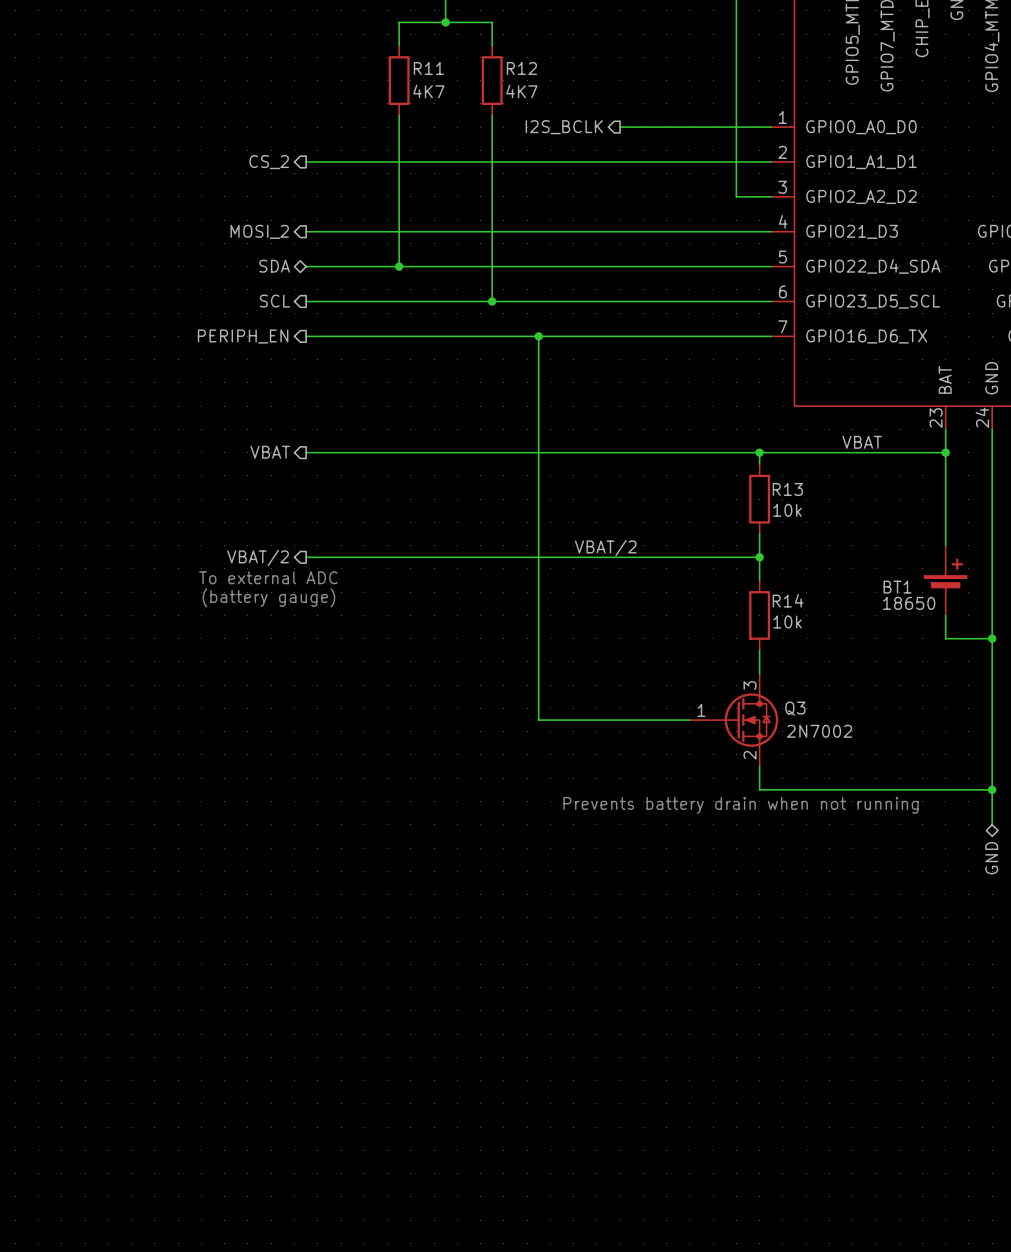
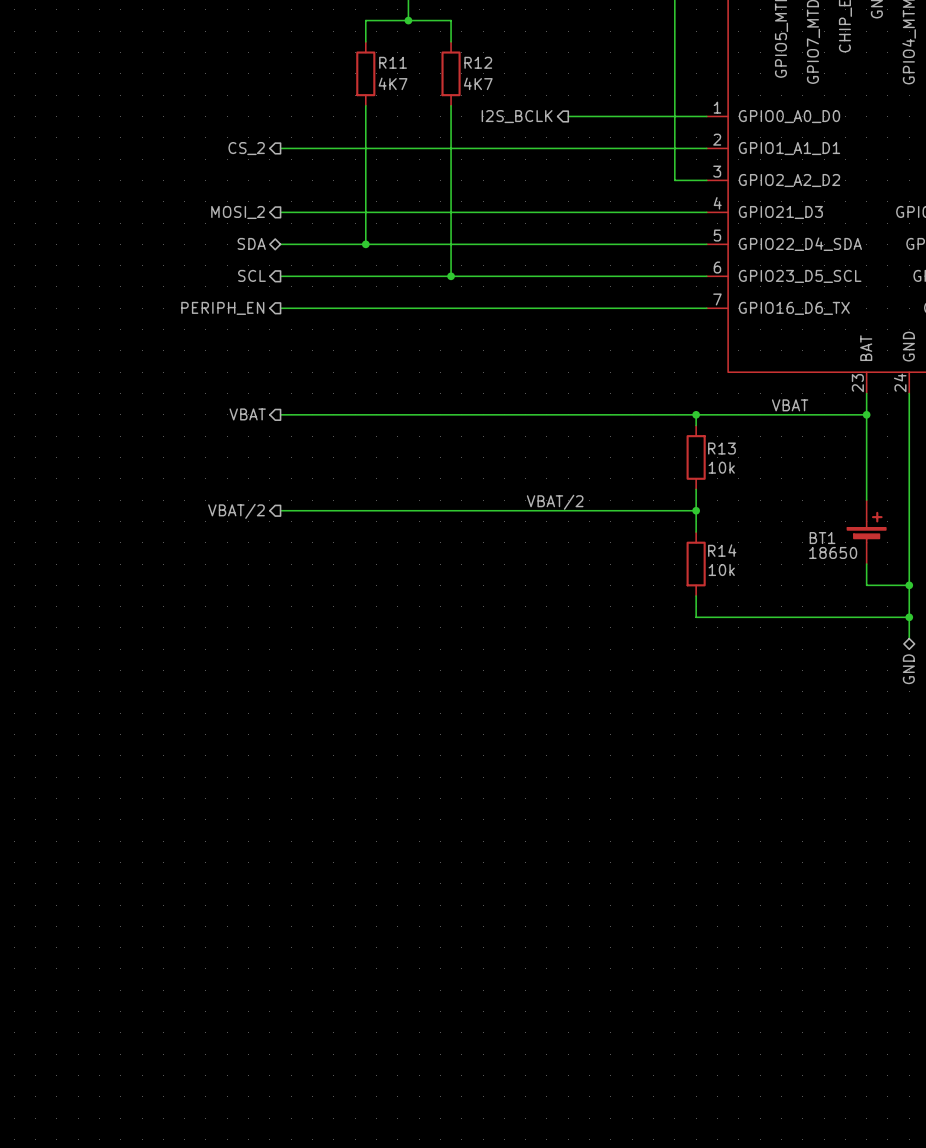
wire: (538, 336) (538, 720) (689, 720) -> none
junction: (538, 336) -> none
text: To external ADC (268, 577) -> none
text: (battery gauge) (268, 597) -> none
wire: none -> (696, 617) (909, 617)
junction: none -> (909, 617)
wire: (992, 696) (992, 824) -> none
Q3: 2N7002 (734, 720) -> none
wire: (759, 766) (759, 789) (992, 789) -> none
junction: (992, 789) -> none
text: Prevents battery drain when not running (741, 805) -> none
hierarchical label position: GND (991, 858) -> GND (908, 669)

